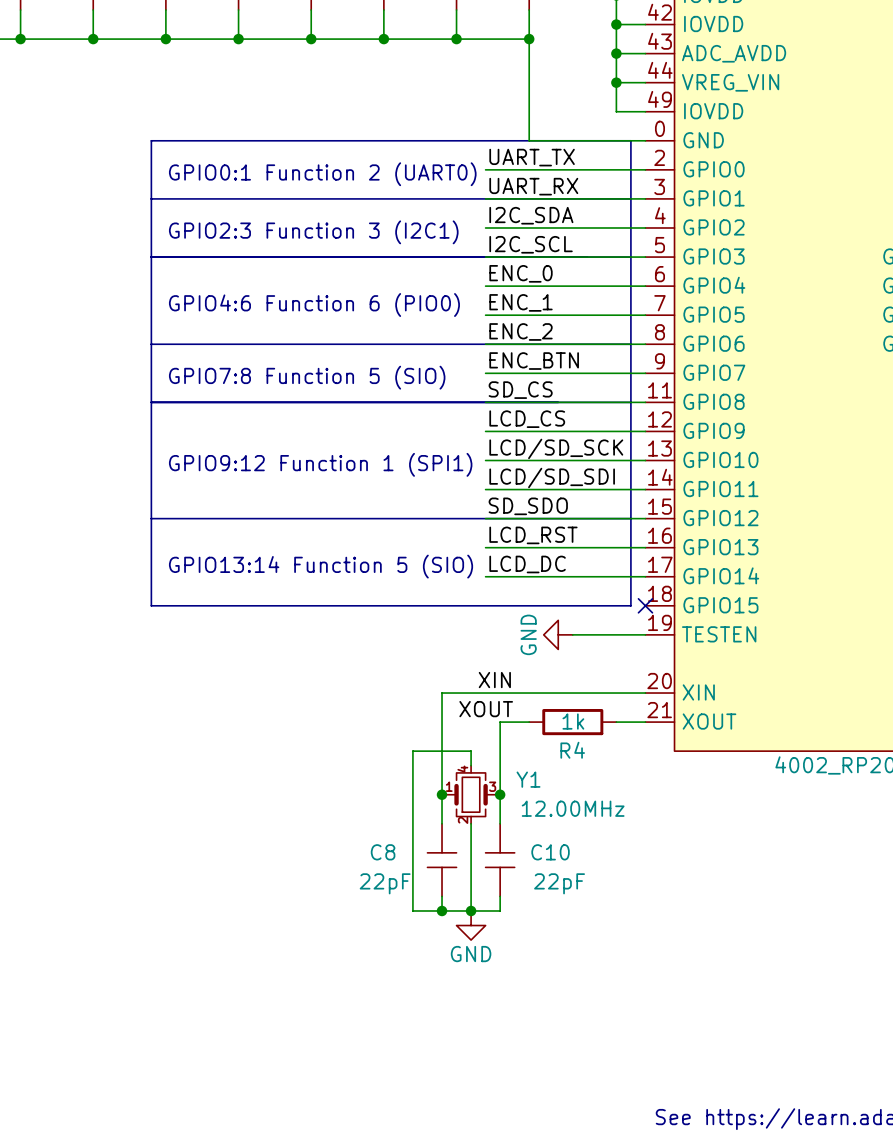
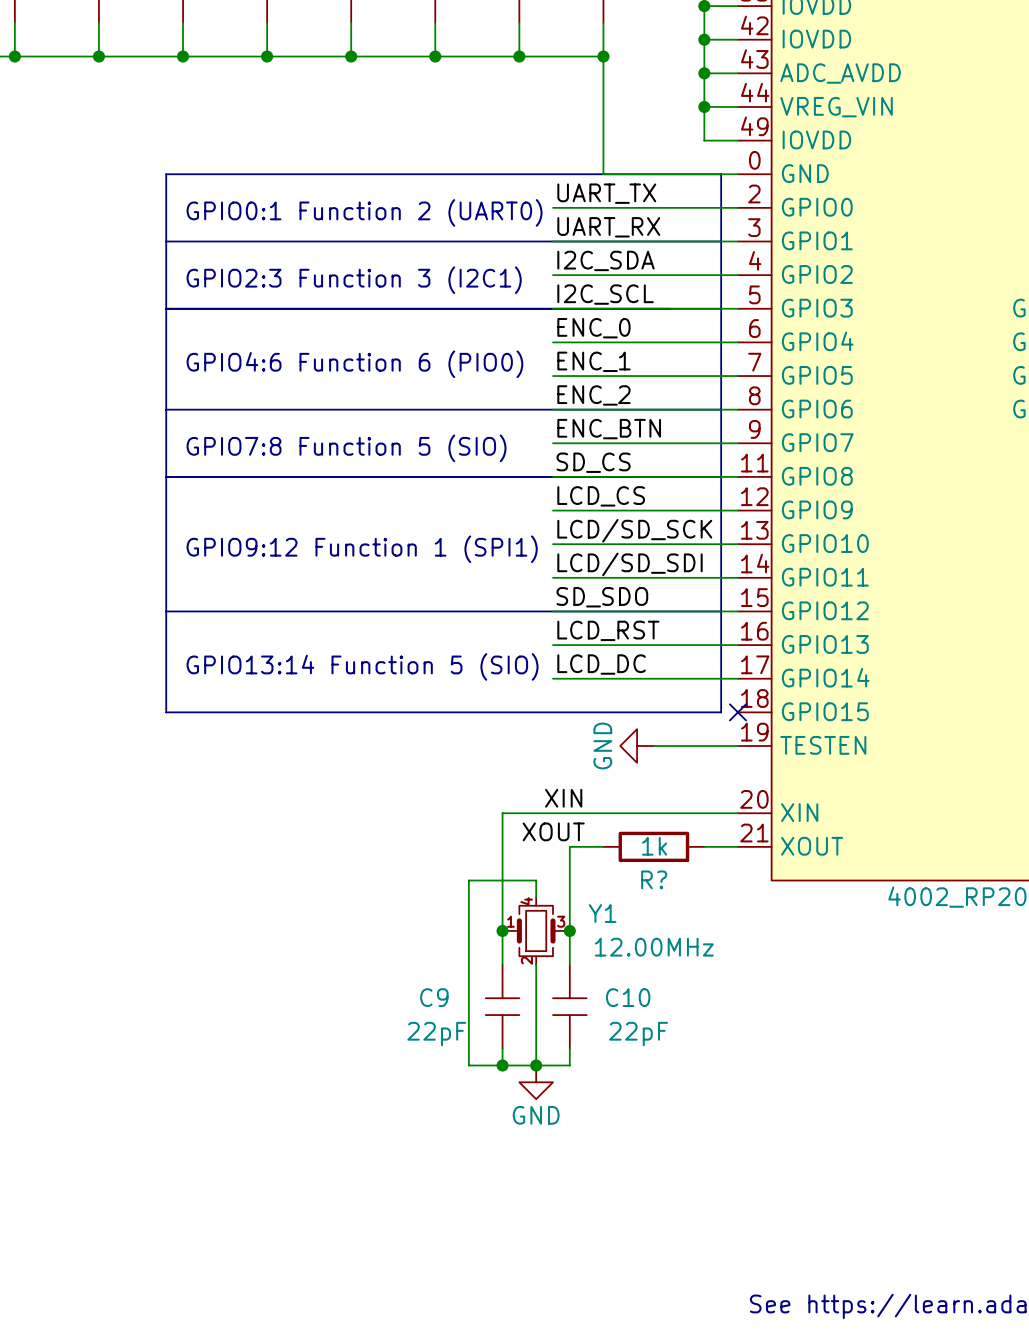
R4 name: R4 (572, 750) -> R? (654, 879)
C8 name: C8 (383, 852) -> C9 (434, 997)

